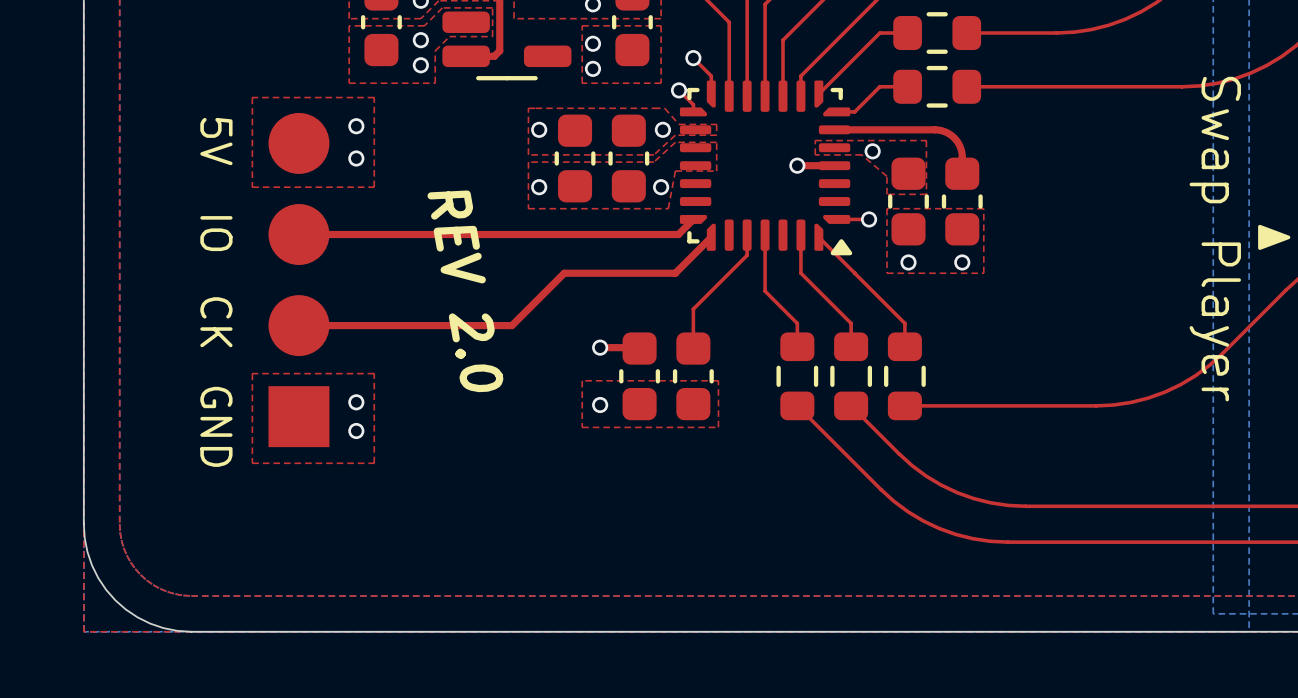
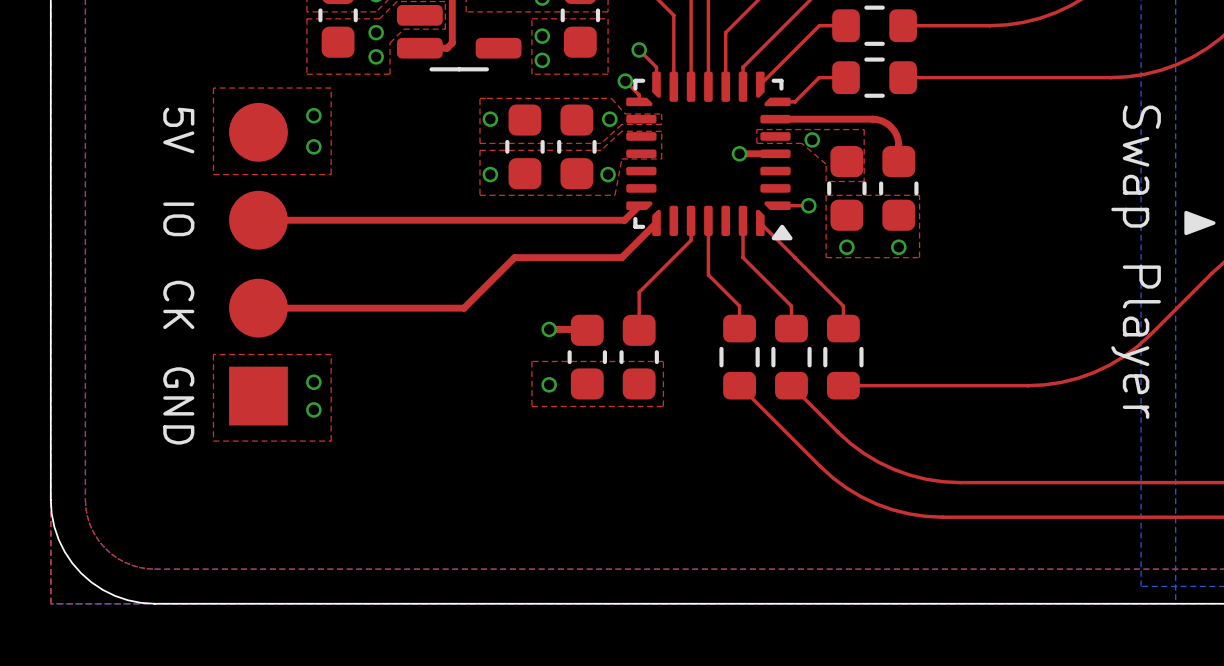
text position: Swap Player (1215, 239) -> Swap Player (1136, 262)
text: REV 2.0 (465, 291) -> none

